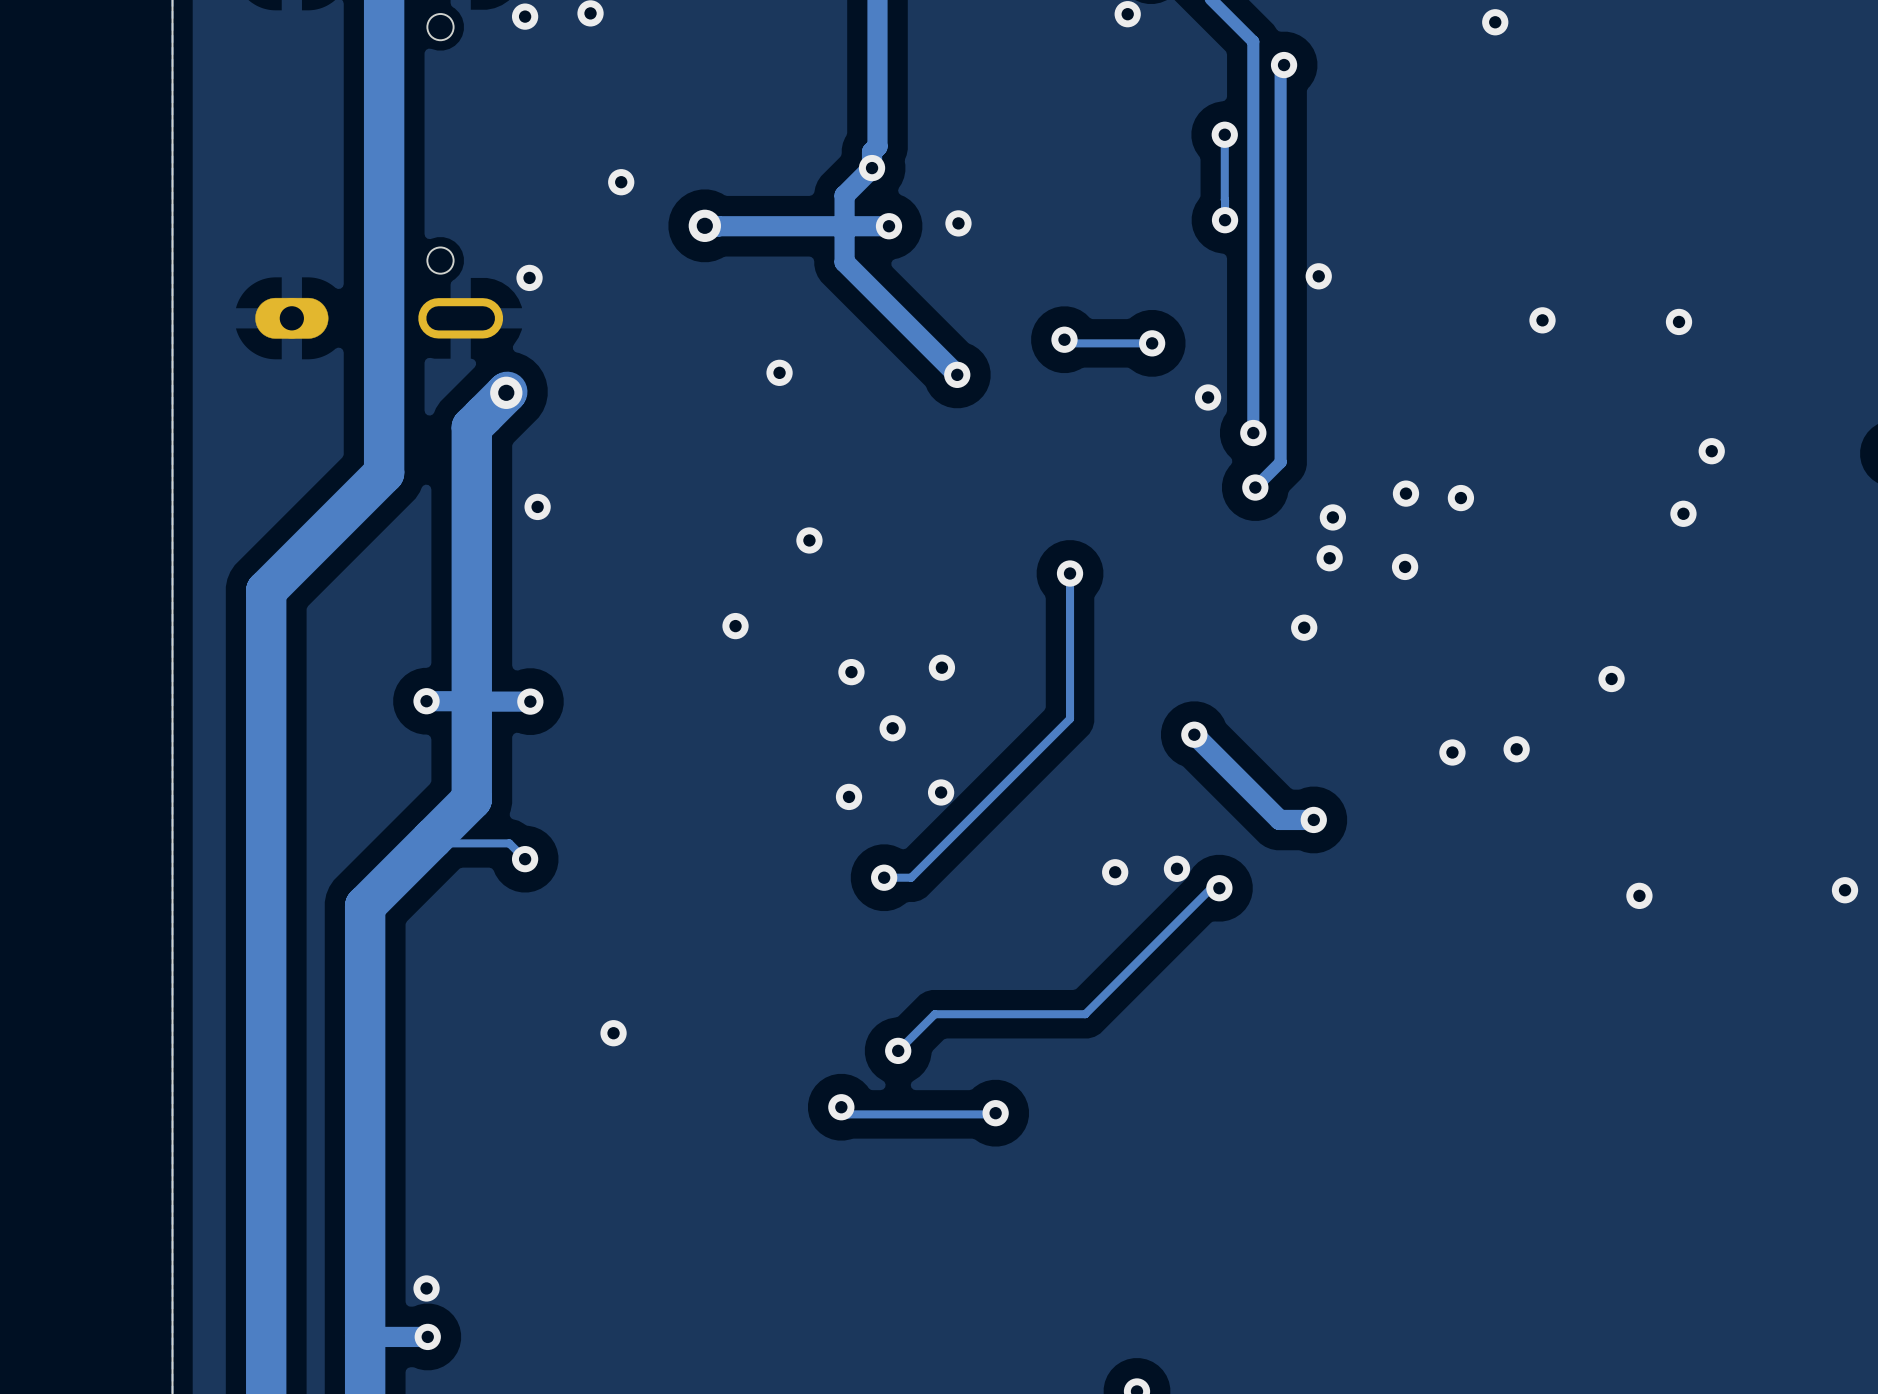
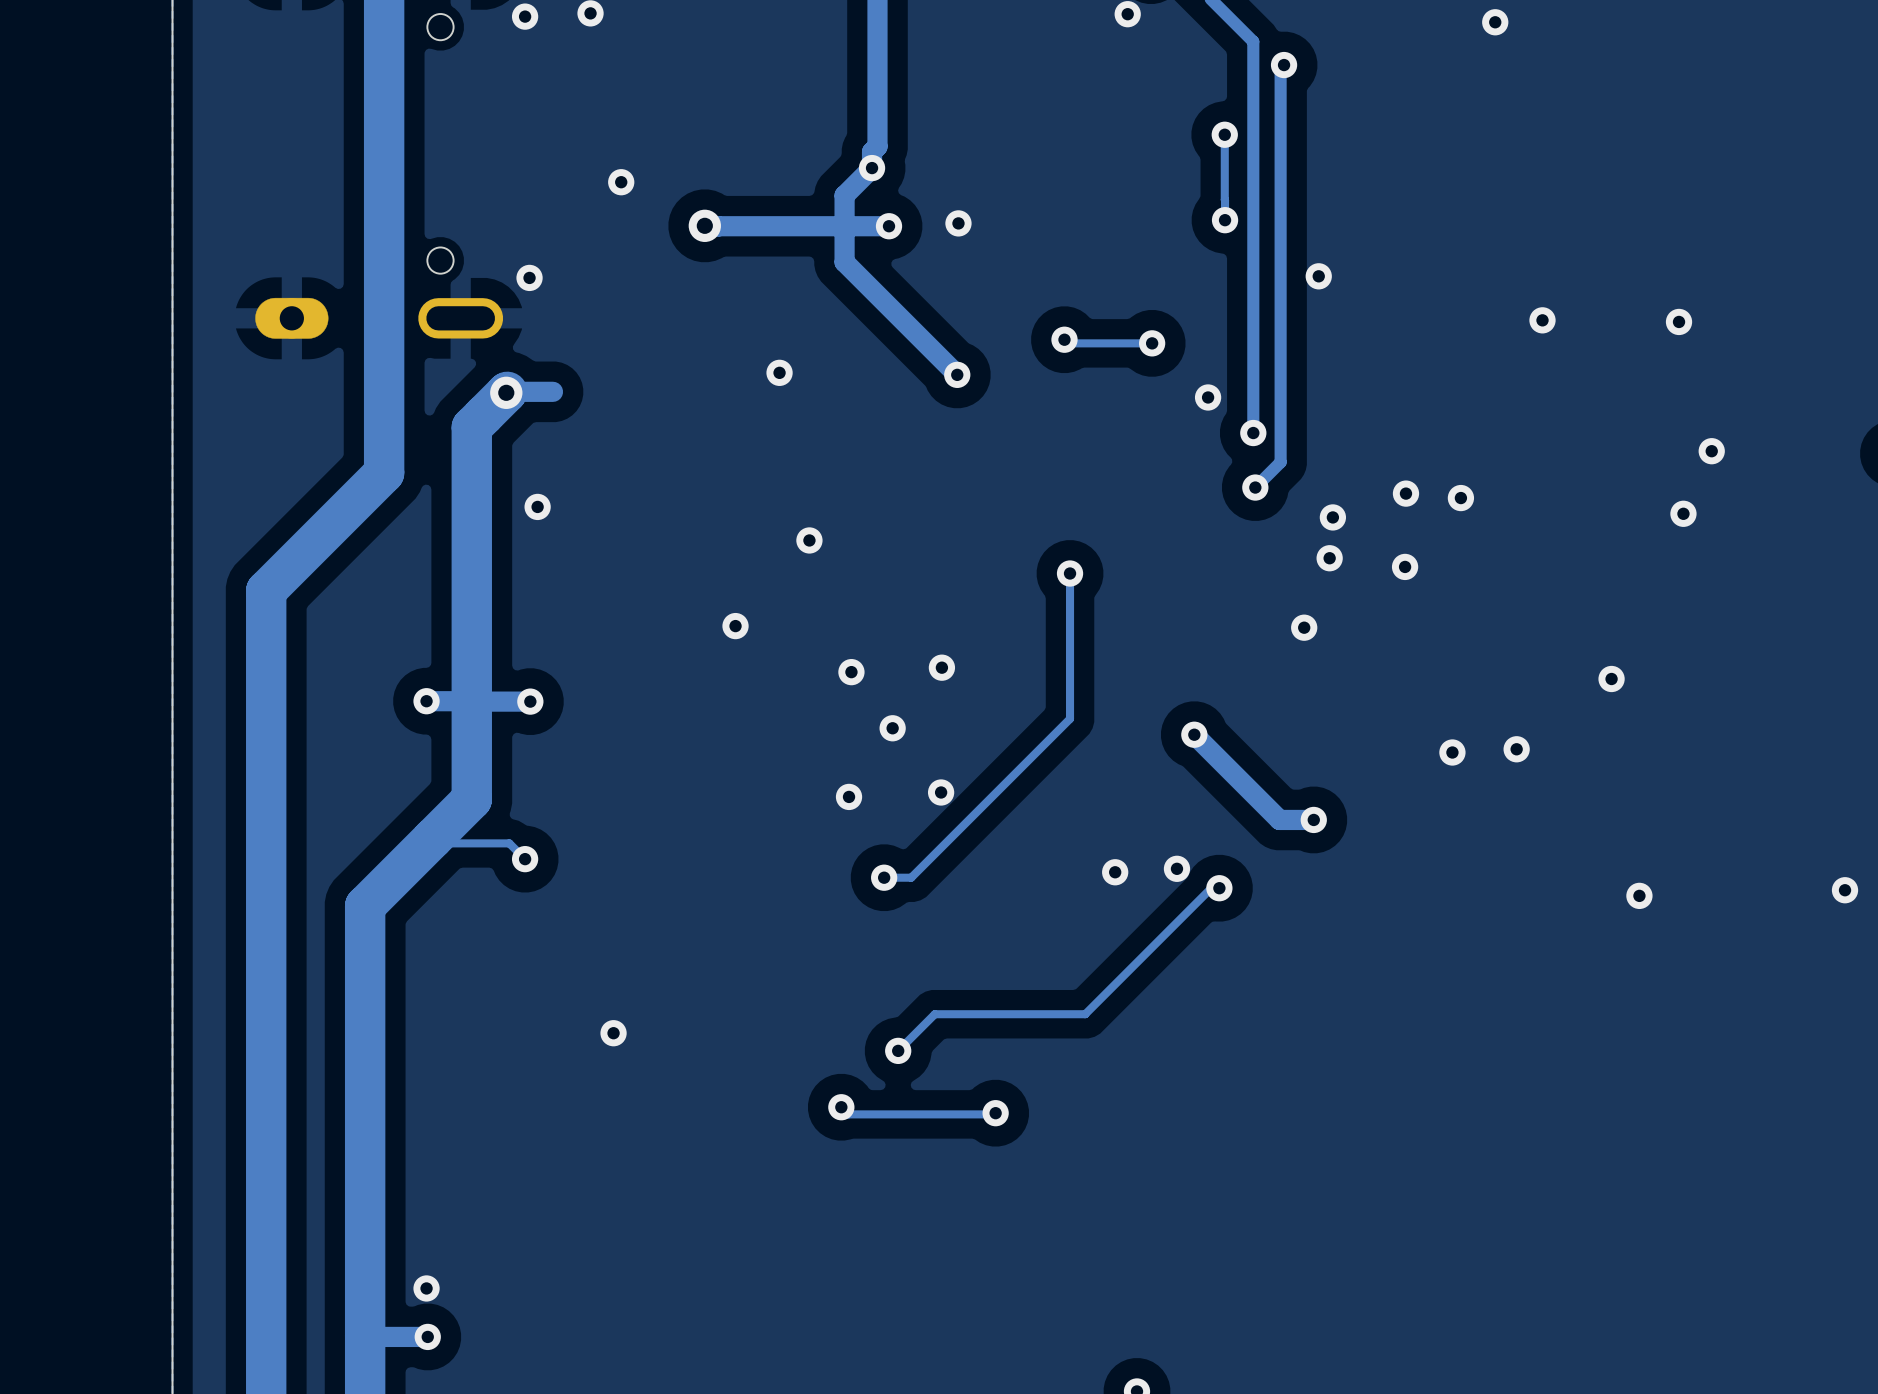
track: none -> (552, 391) (507, 391)

